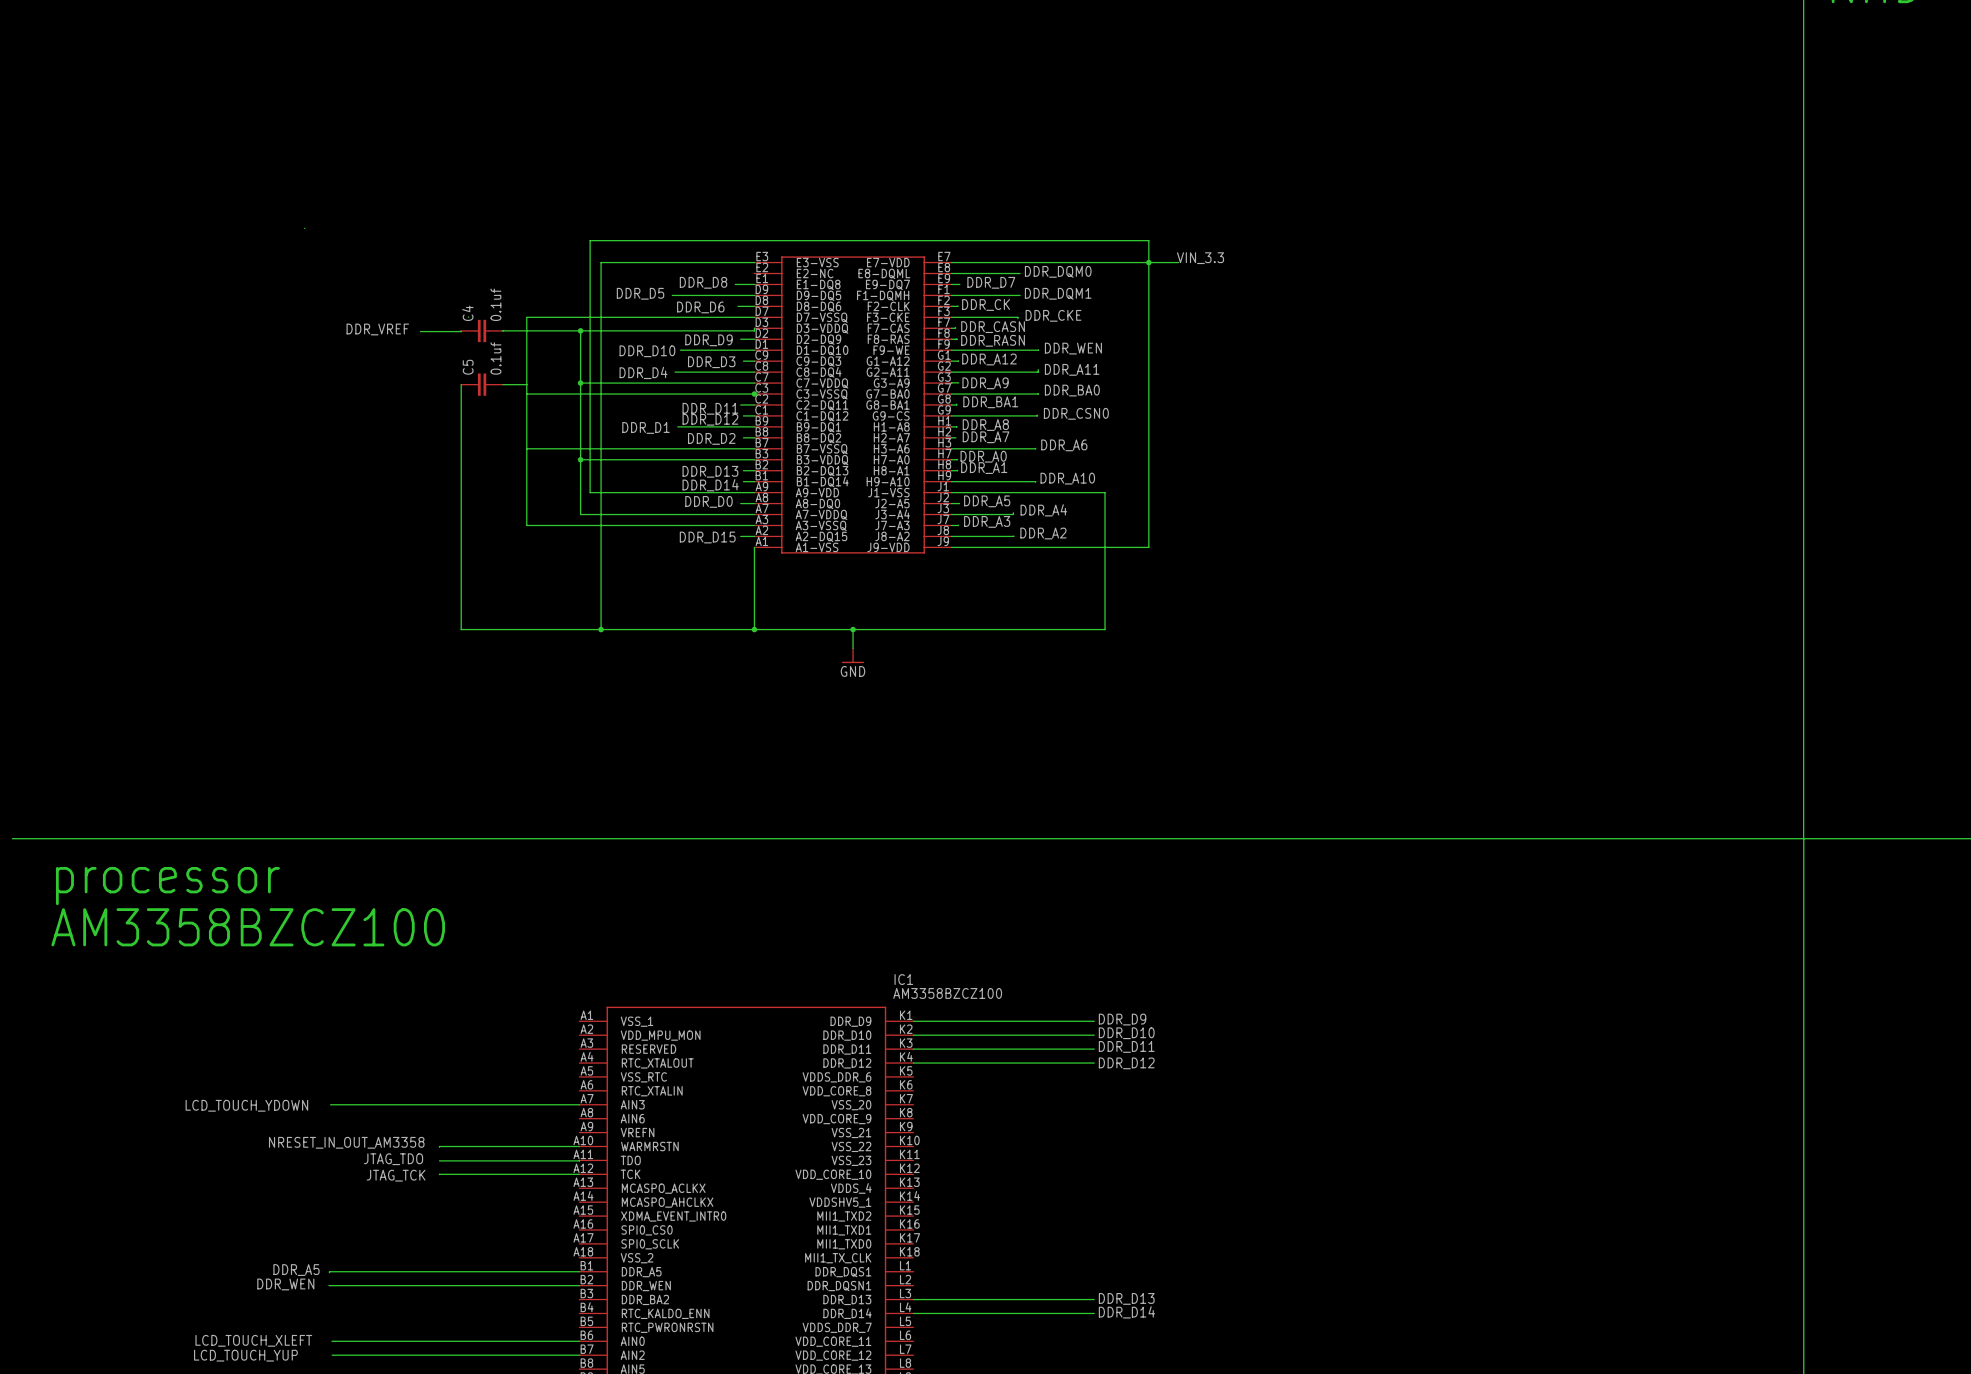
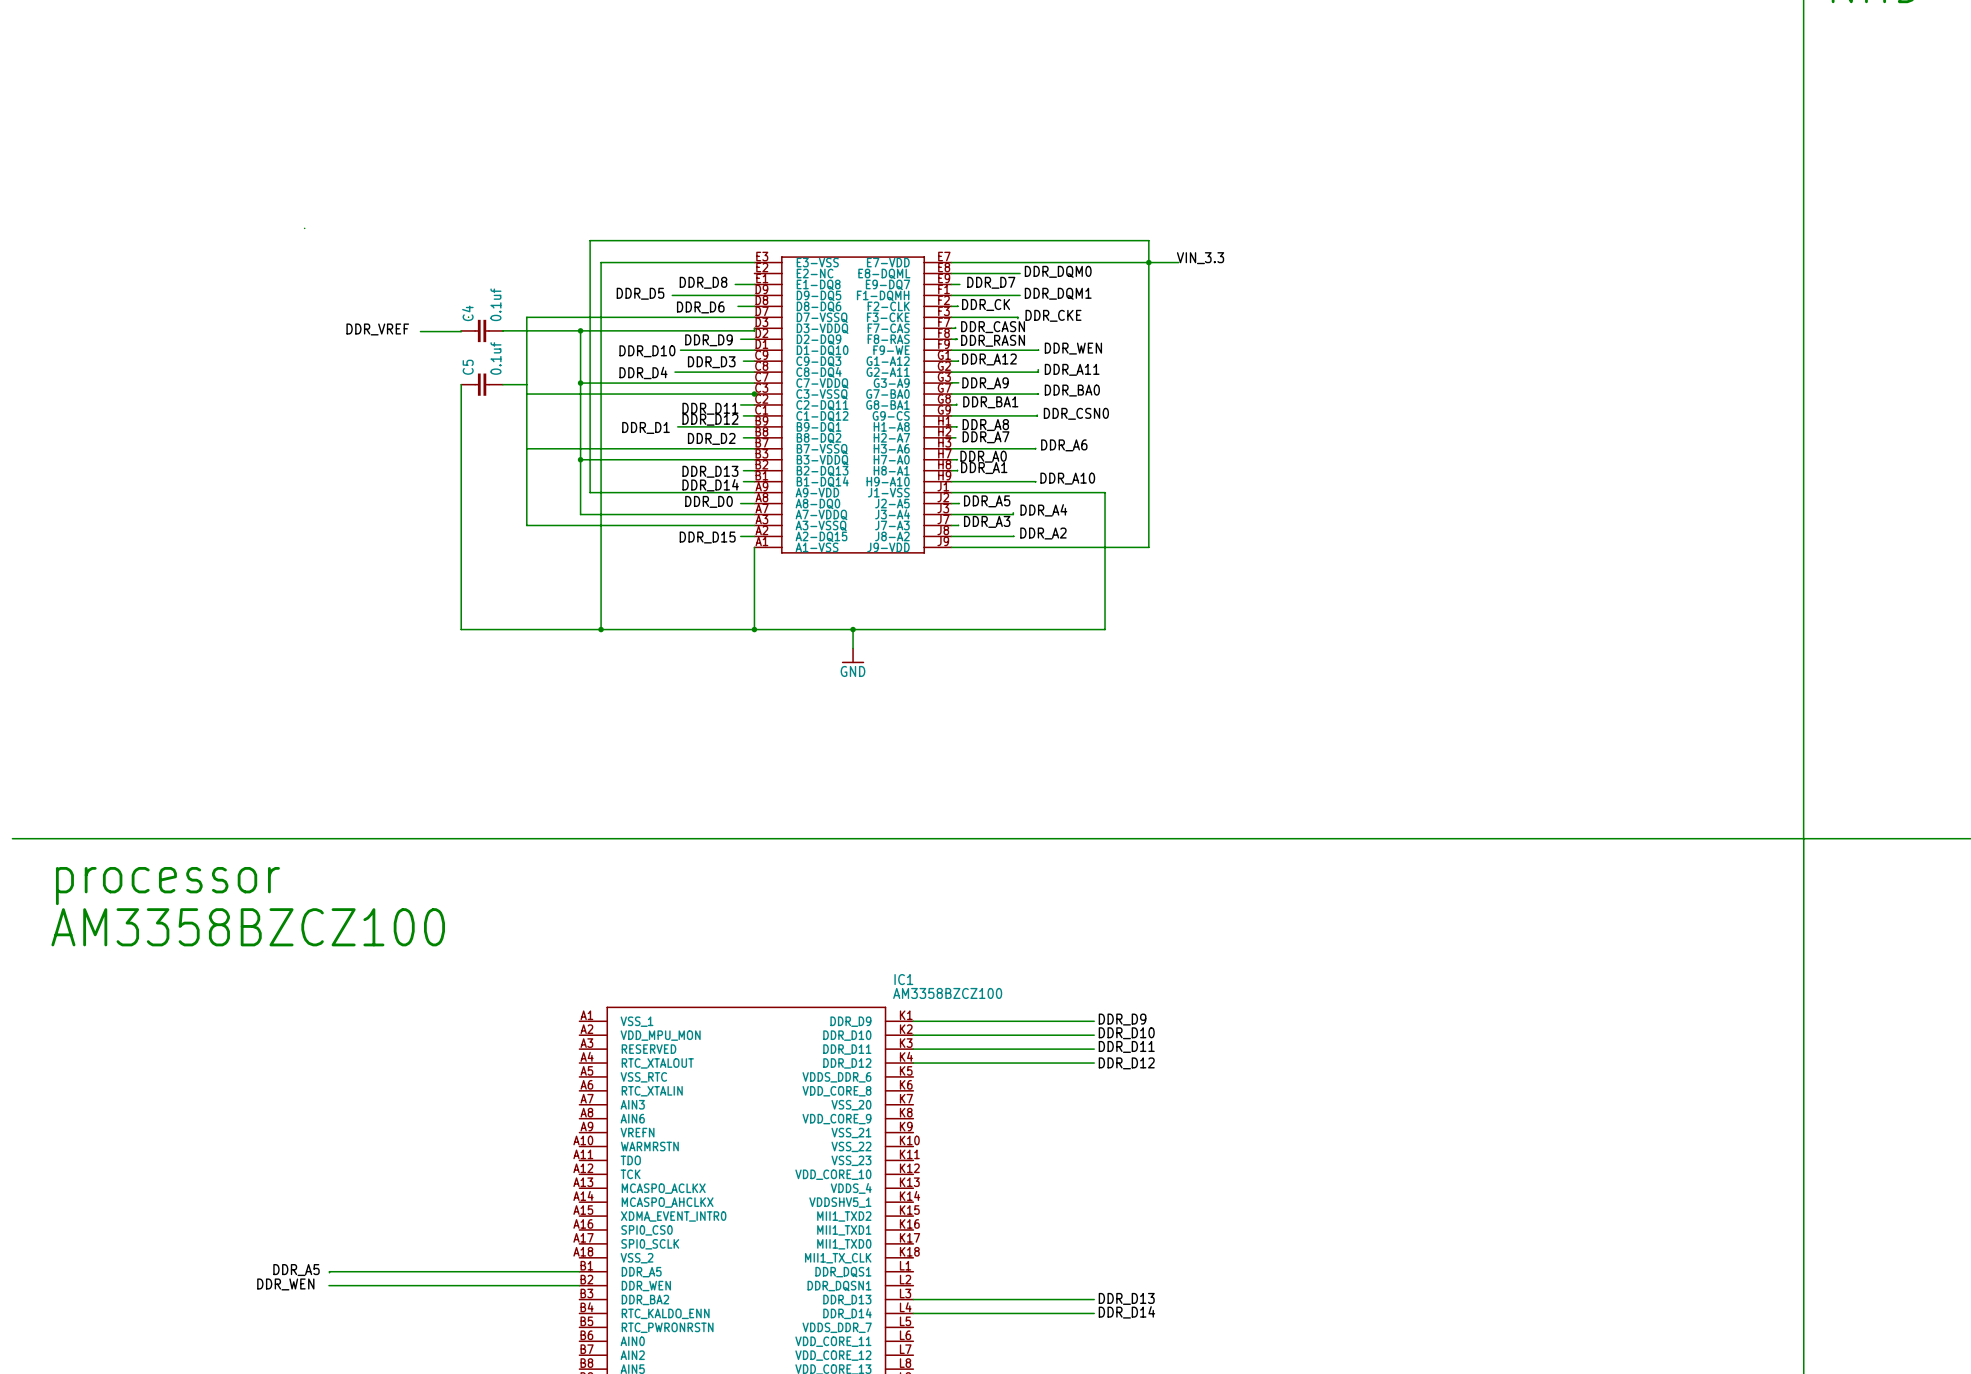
wire: (330, 1104) (579, 1104) -> none
label: LCD_TOUCH_YDOWN (246, 1105) -> none
label: NRESET_IN_OUT_AM3358 (346, 1142) -> none
wire: (579, 1146) (439, 1147) -> none
label: JTAG_TDO (393, 1159) -> none
wire: (579, 1160) (439, 1160) -> none
wire: (579, 1174) (439, 1174) -> none
label: JTAG_TCK (396, 1175) -> none
label: LCD_TOUCH_XLEFT (253, 1340) -> none
wire: (332, 1341) (579, 1341) -> none
label: LCD_TOUCH_YUP (245, 1355) -> none
wire: (332, 1355) (579, 1355) -> none

